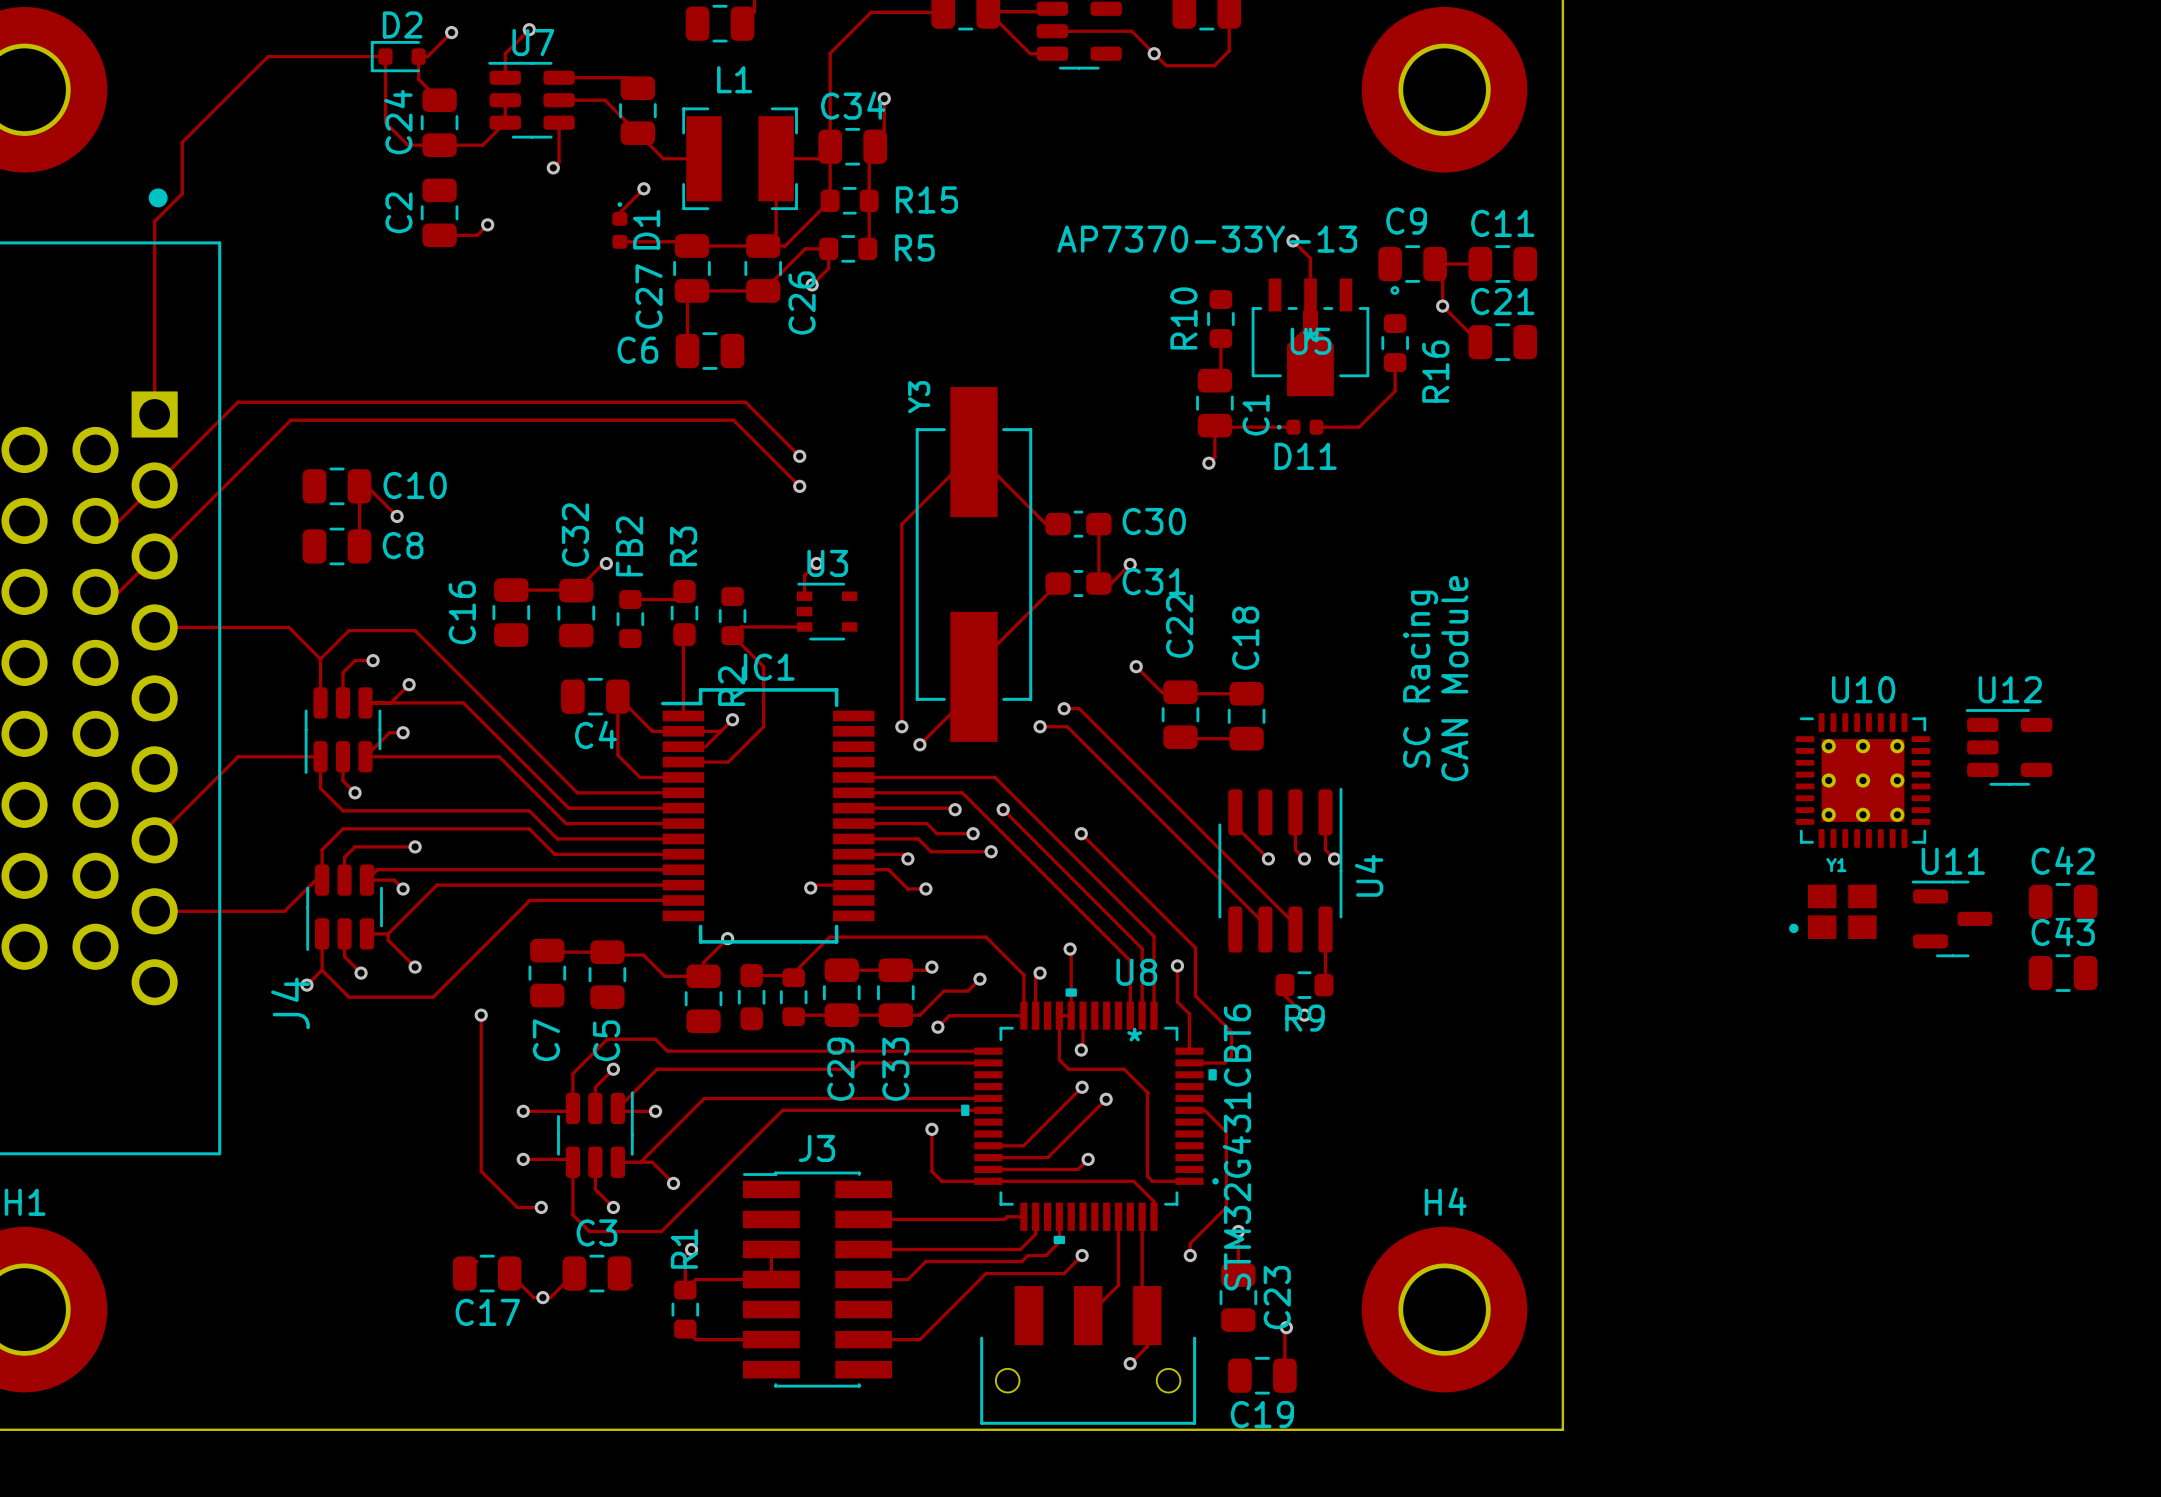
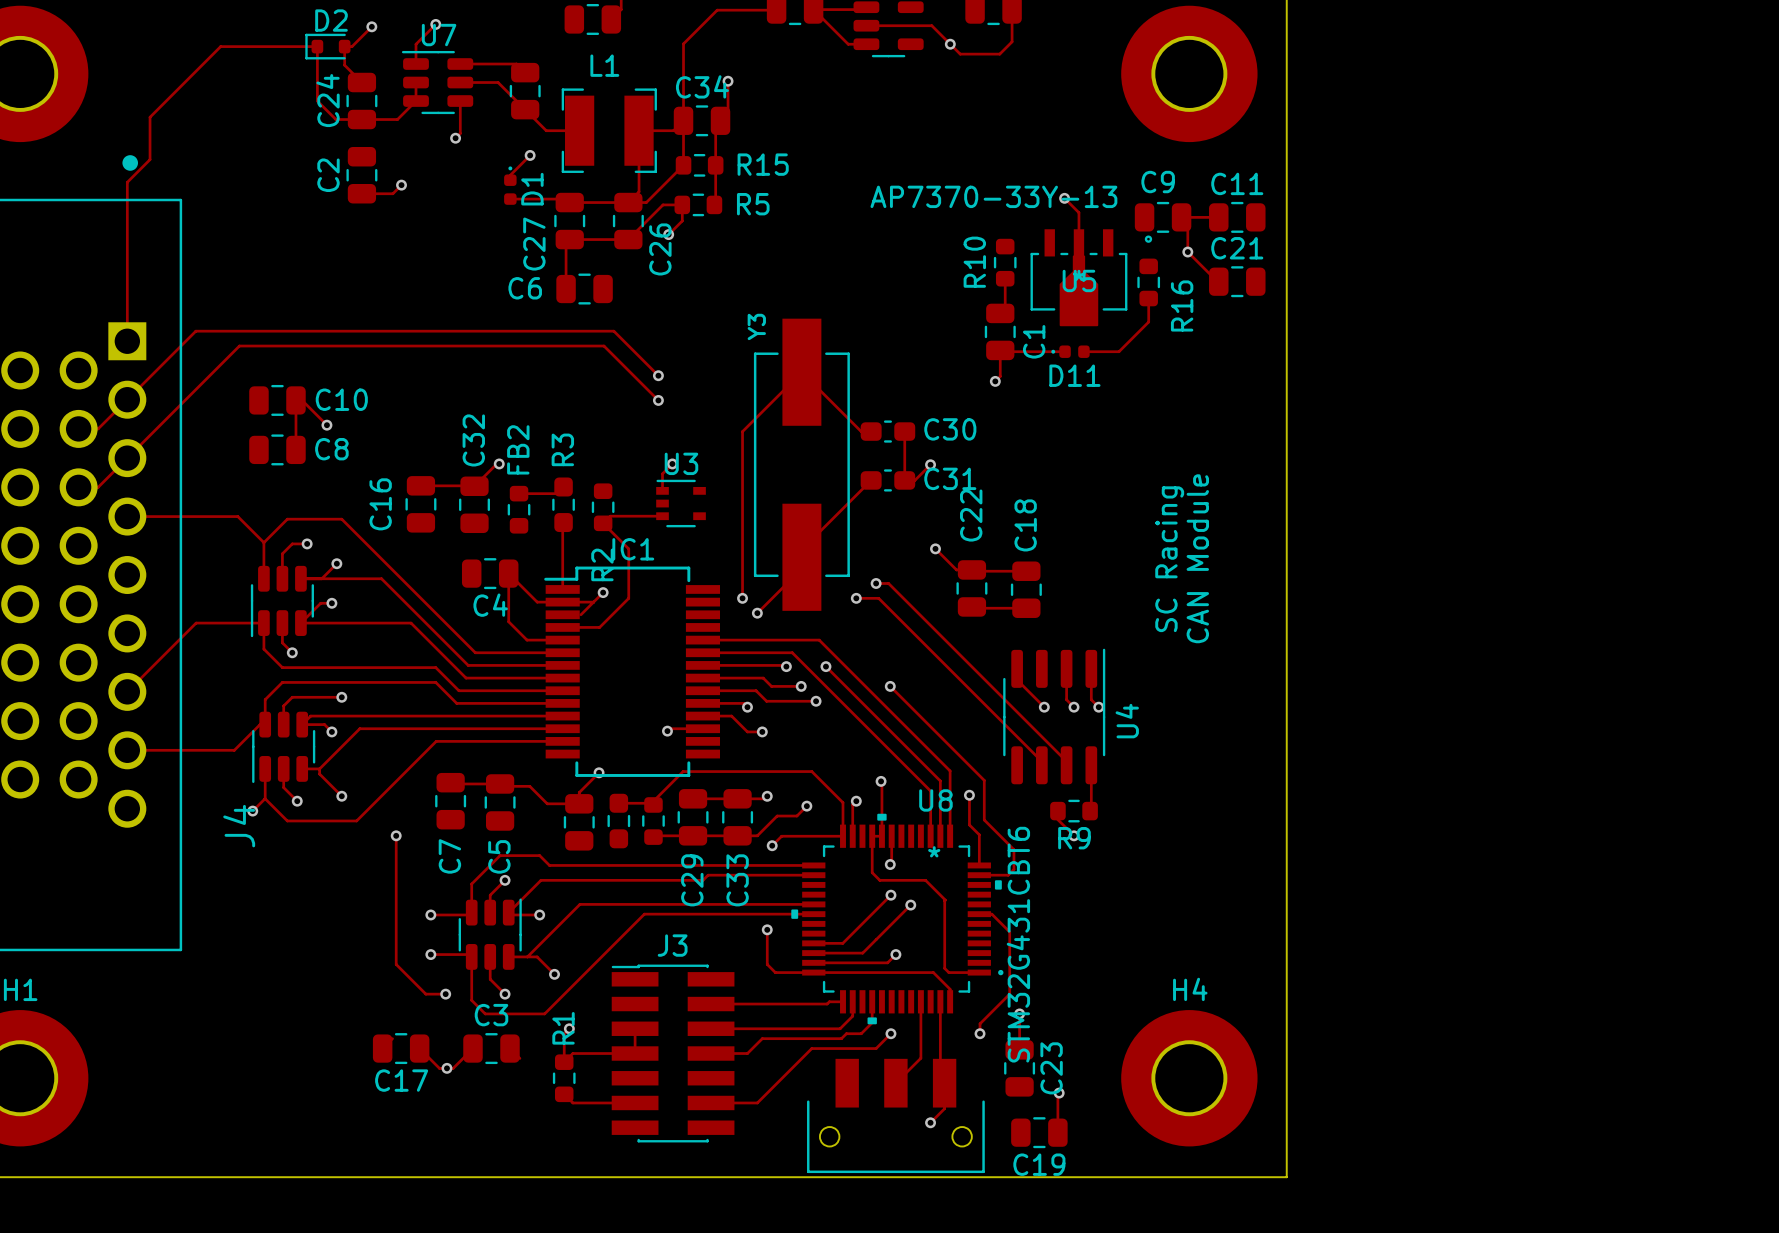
U12: (2009, 747) -> none
U10: (1863, 780) -> none
C42: (2063, 901) -> none
Y1: (1832, 911) -> none
U11: (1951, 918) -> none
C43: (2063, 973) -> none

